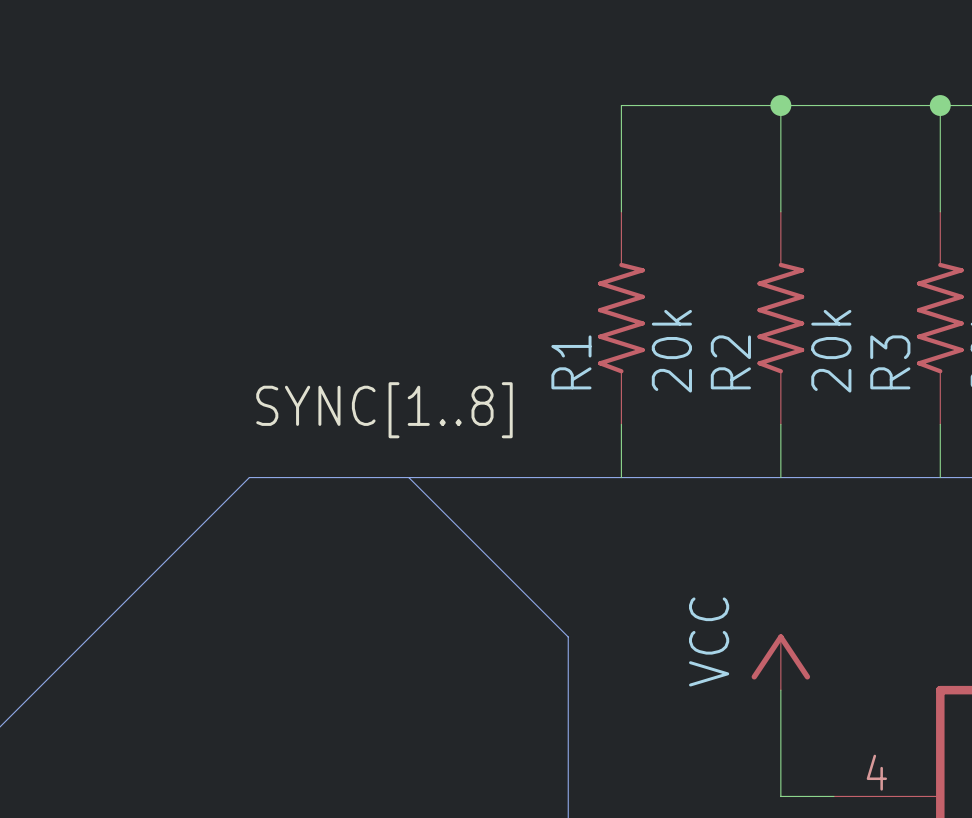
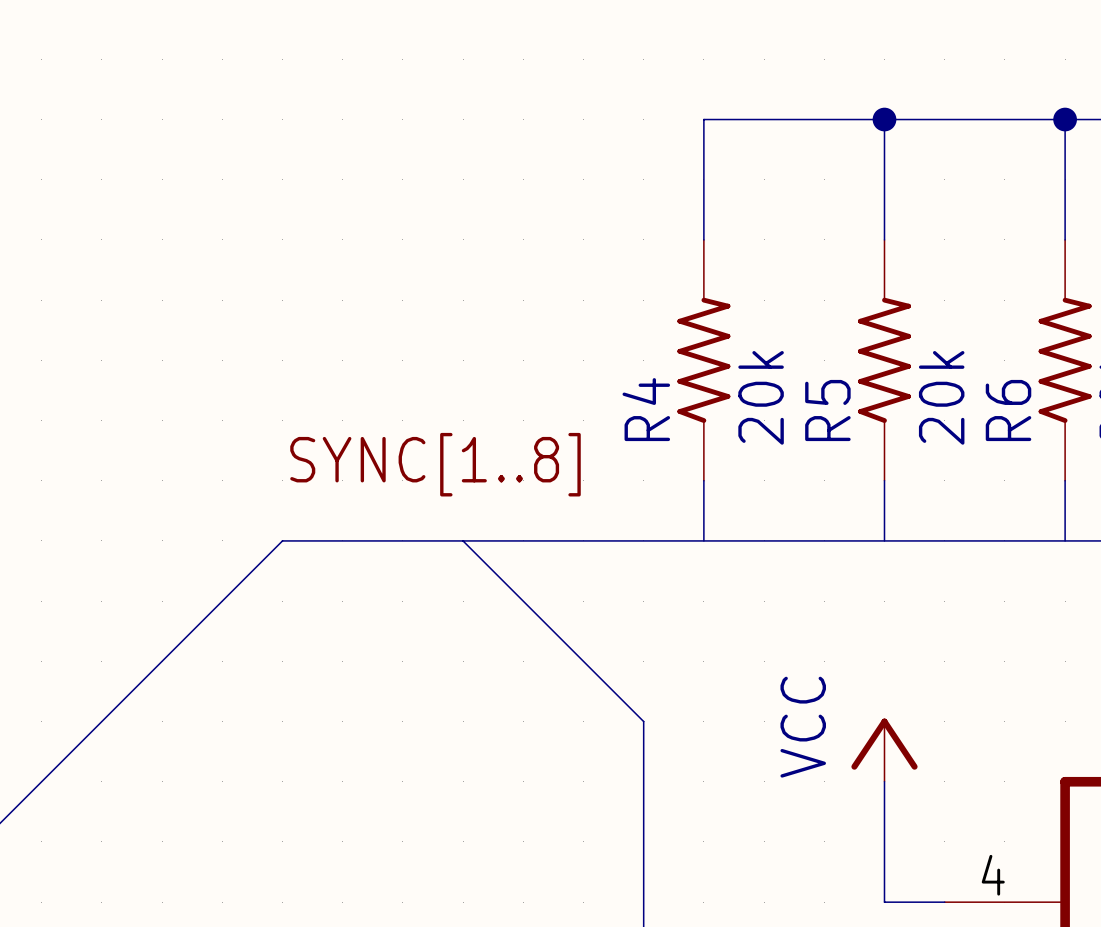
R1 name: R1 (571, 362) -> R4 (646, 409)
R2 name: R2 (730, 362) -> R5 (827, 410)
R3 name: R3 (890, 362) -> R6 (1008, 410)

